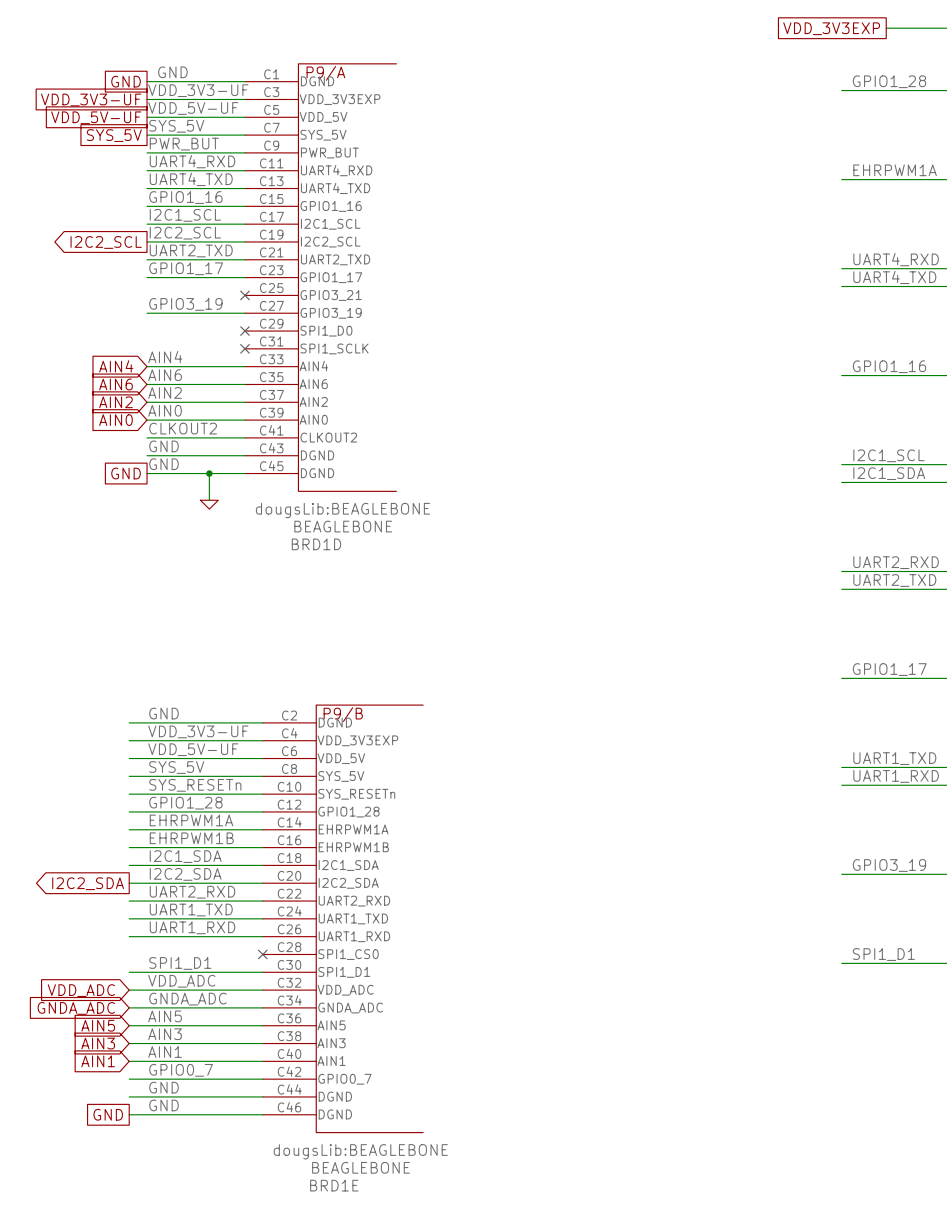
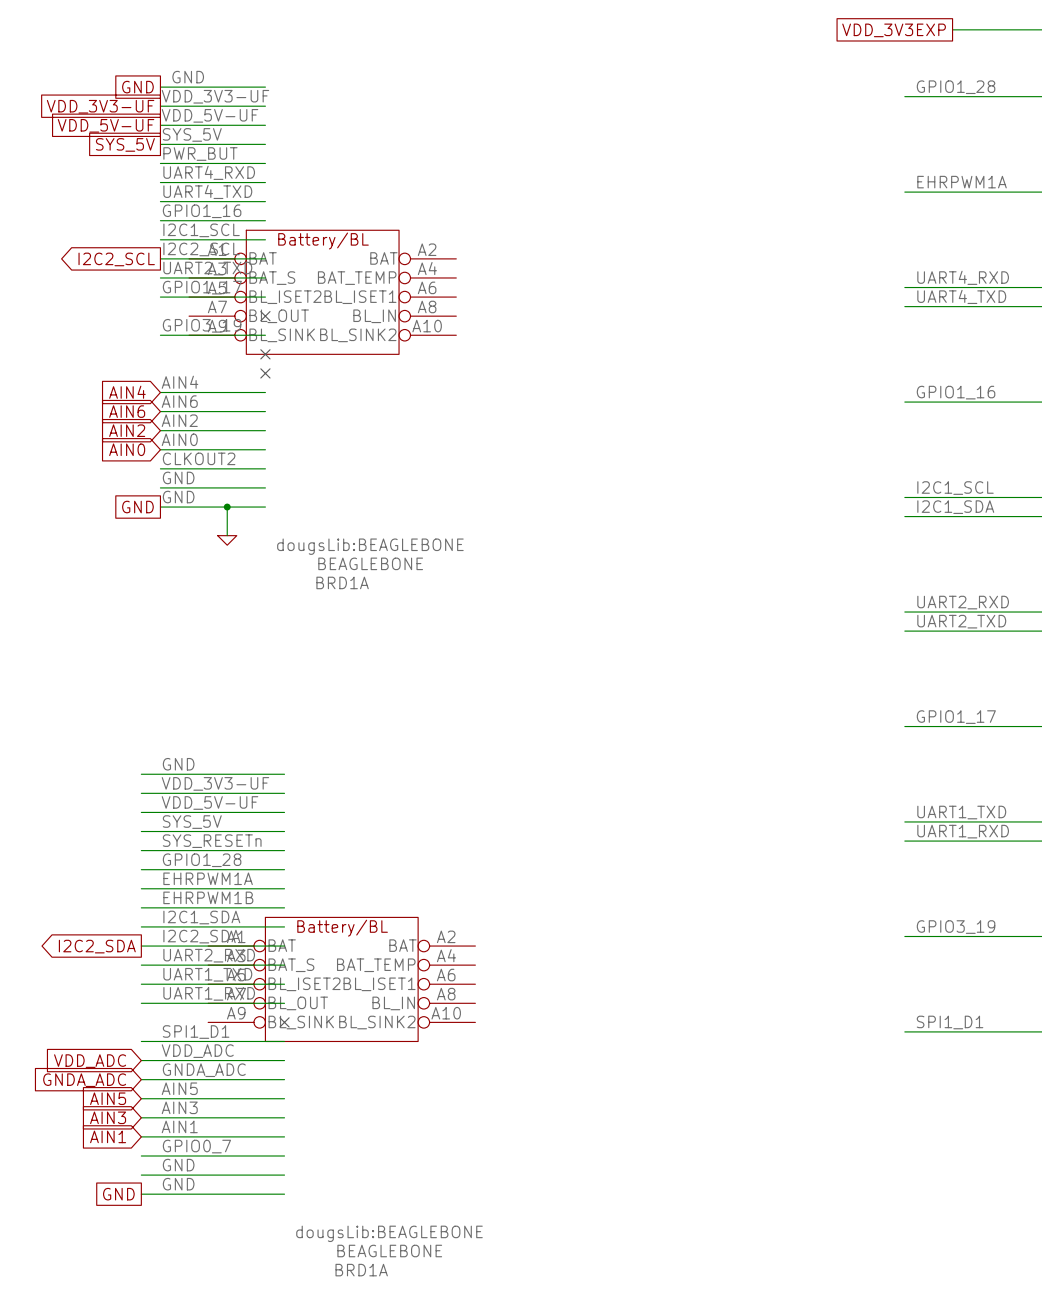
BRD1A: none -> BEAGLEBONE (322, 292)
BRD1D: BEAGLEBONE (320, 277) -> none
BRD1A: none -> BEAGLEBONE (341, 979)
BRD1E: BEAGLEBONE (342, 918) -> none

